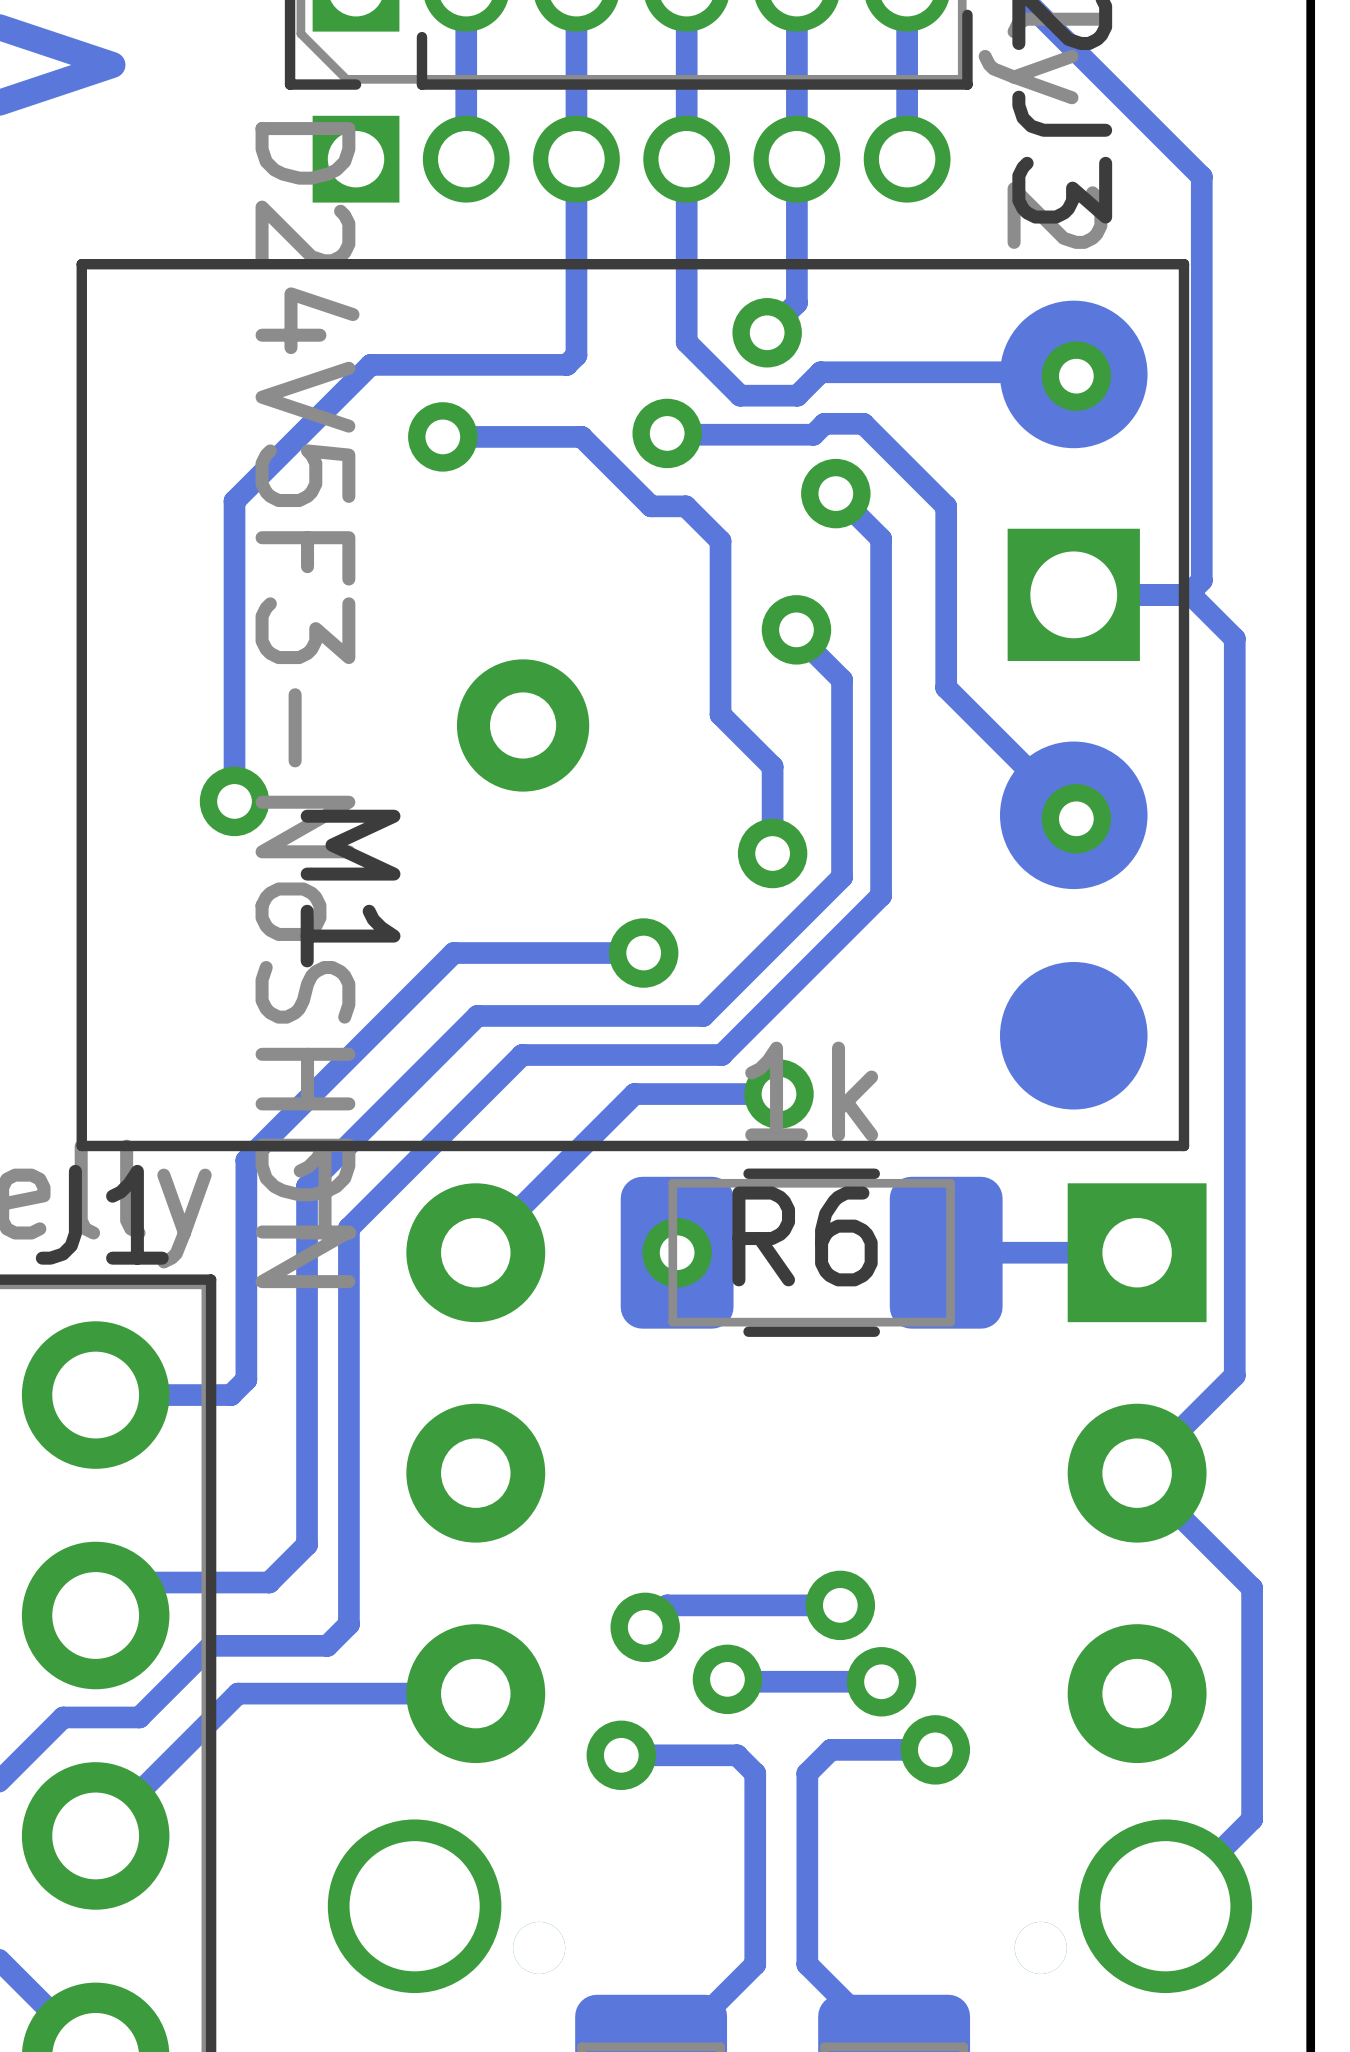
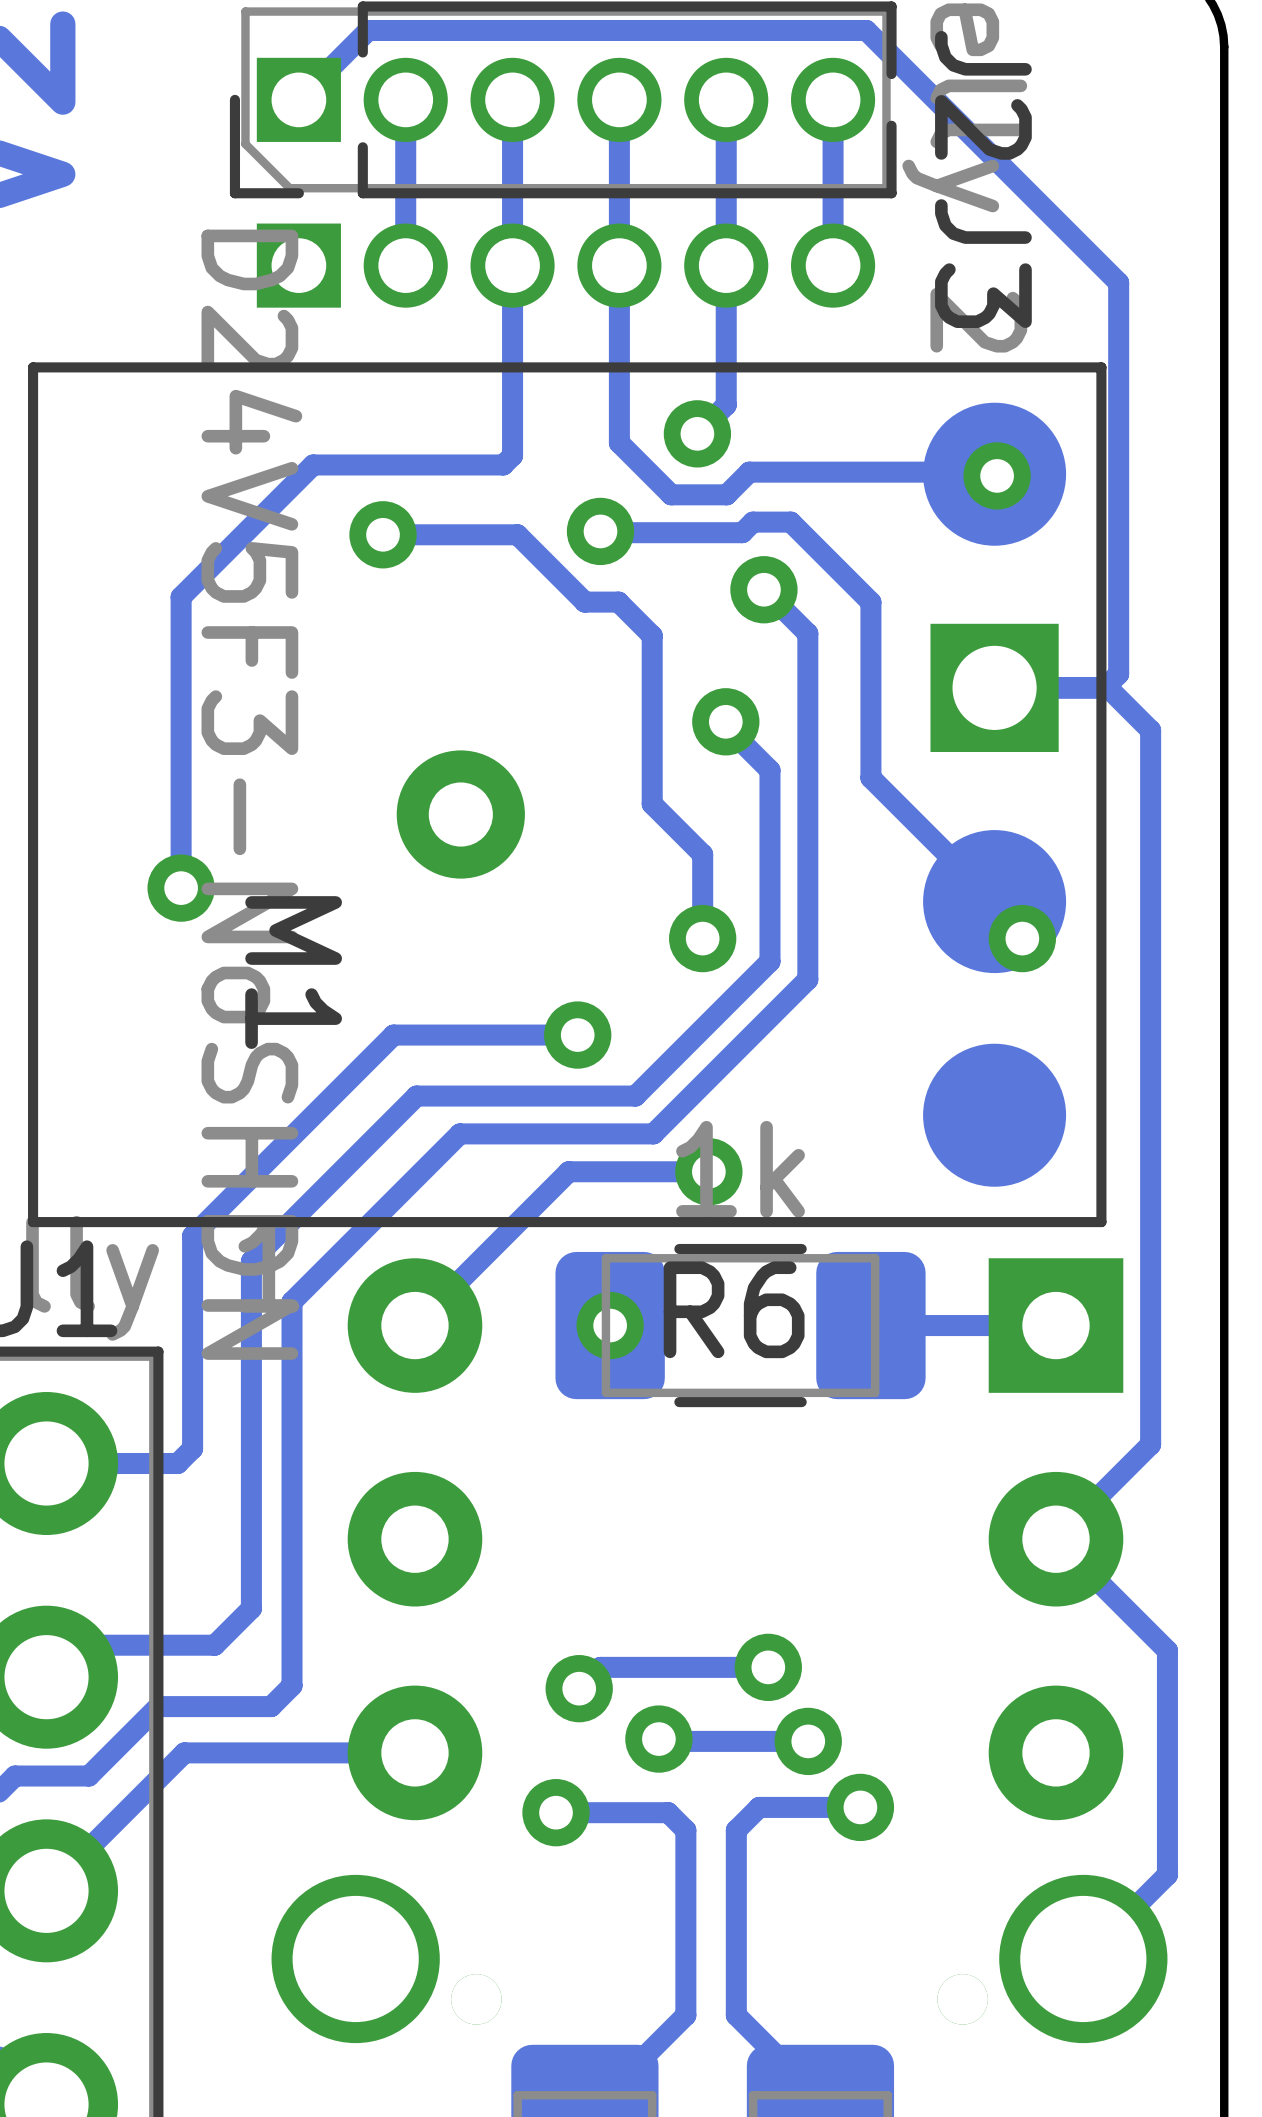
via position: (1076, 818) -> (1022, 938)

